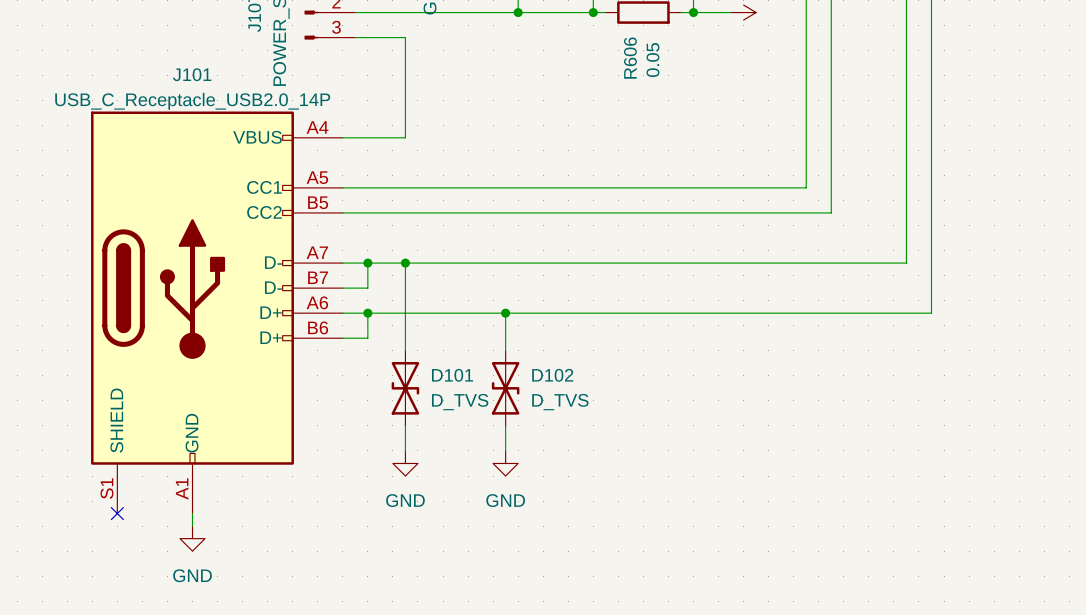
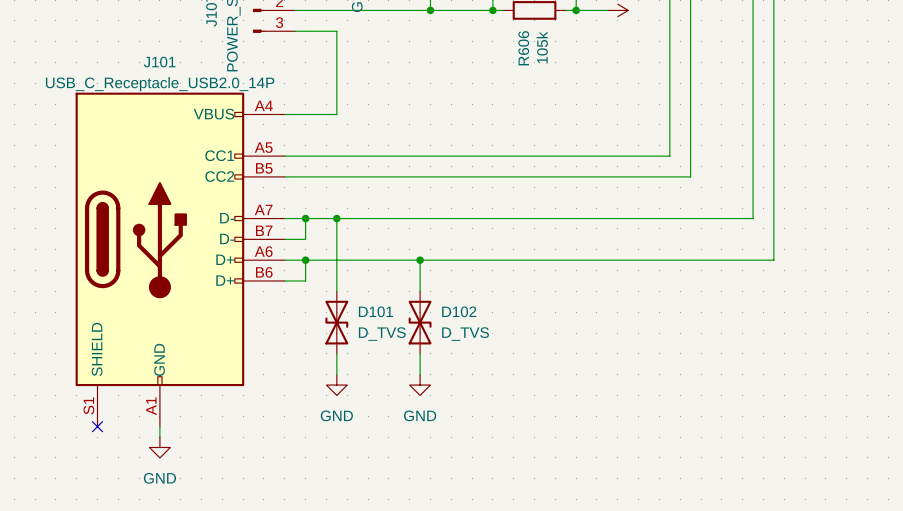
R606 value: 0.05 (652, 60) -> 105k (542, 47)

